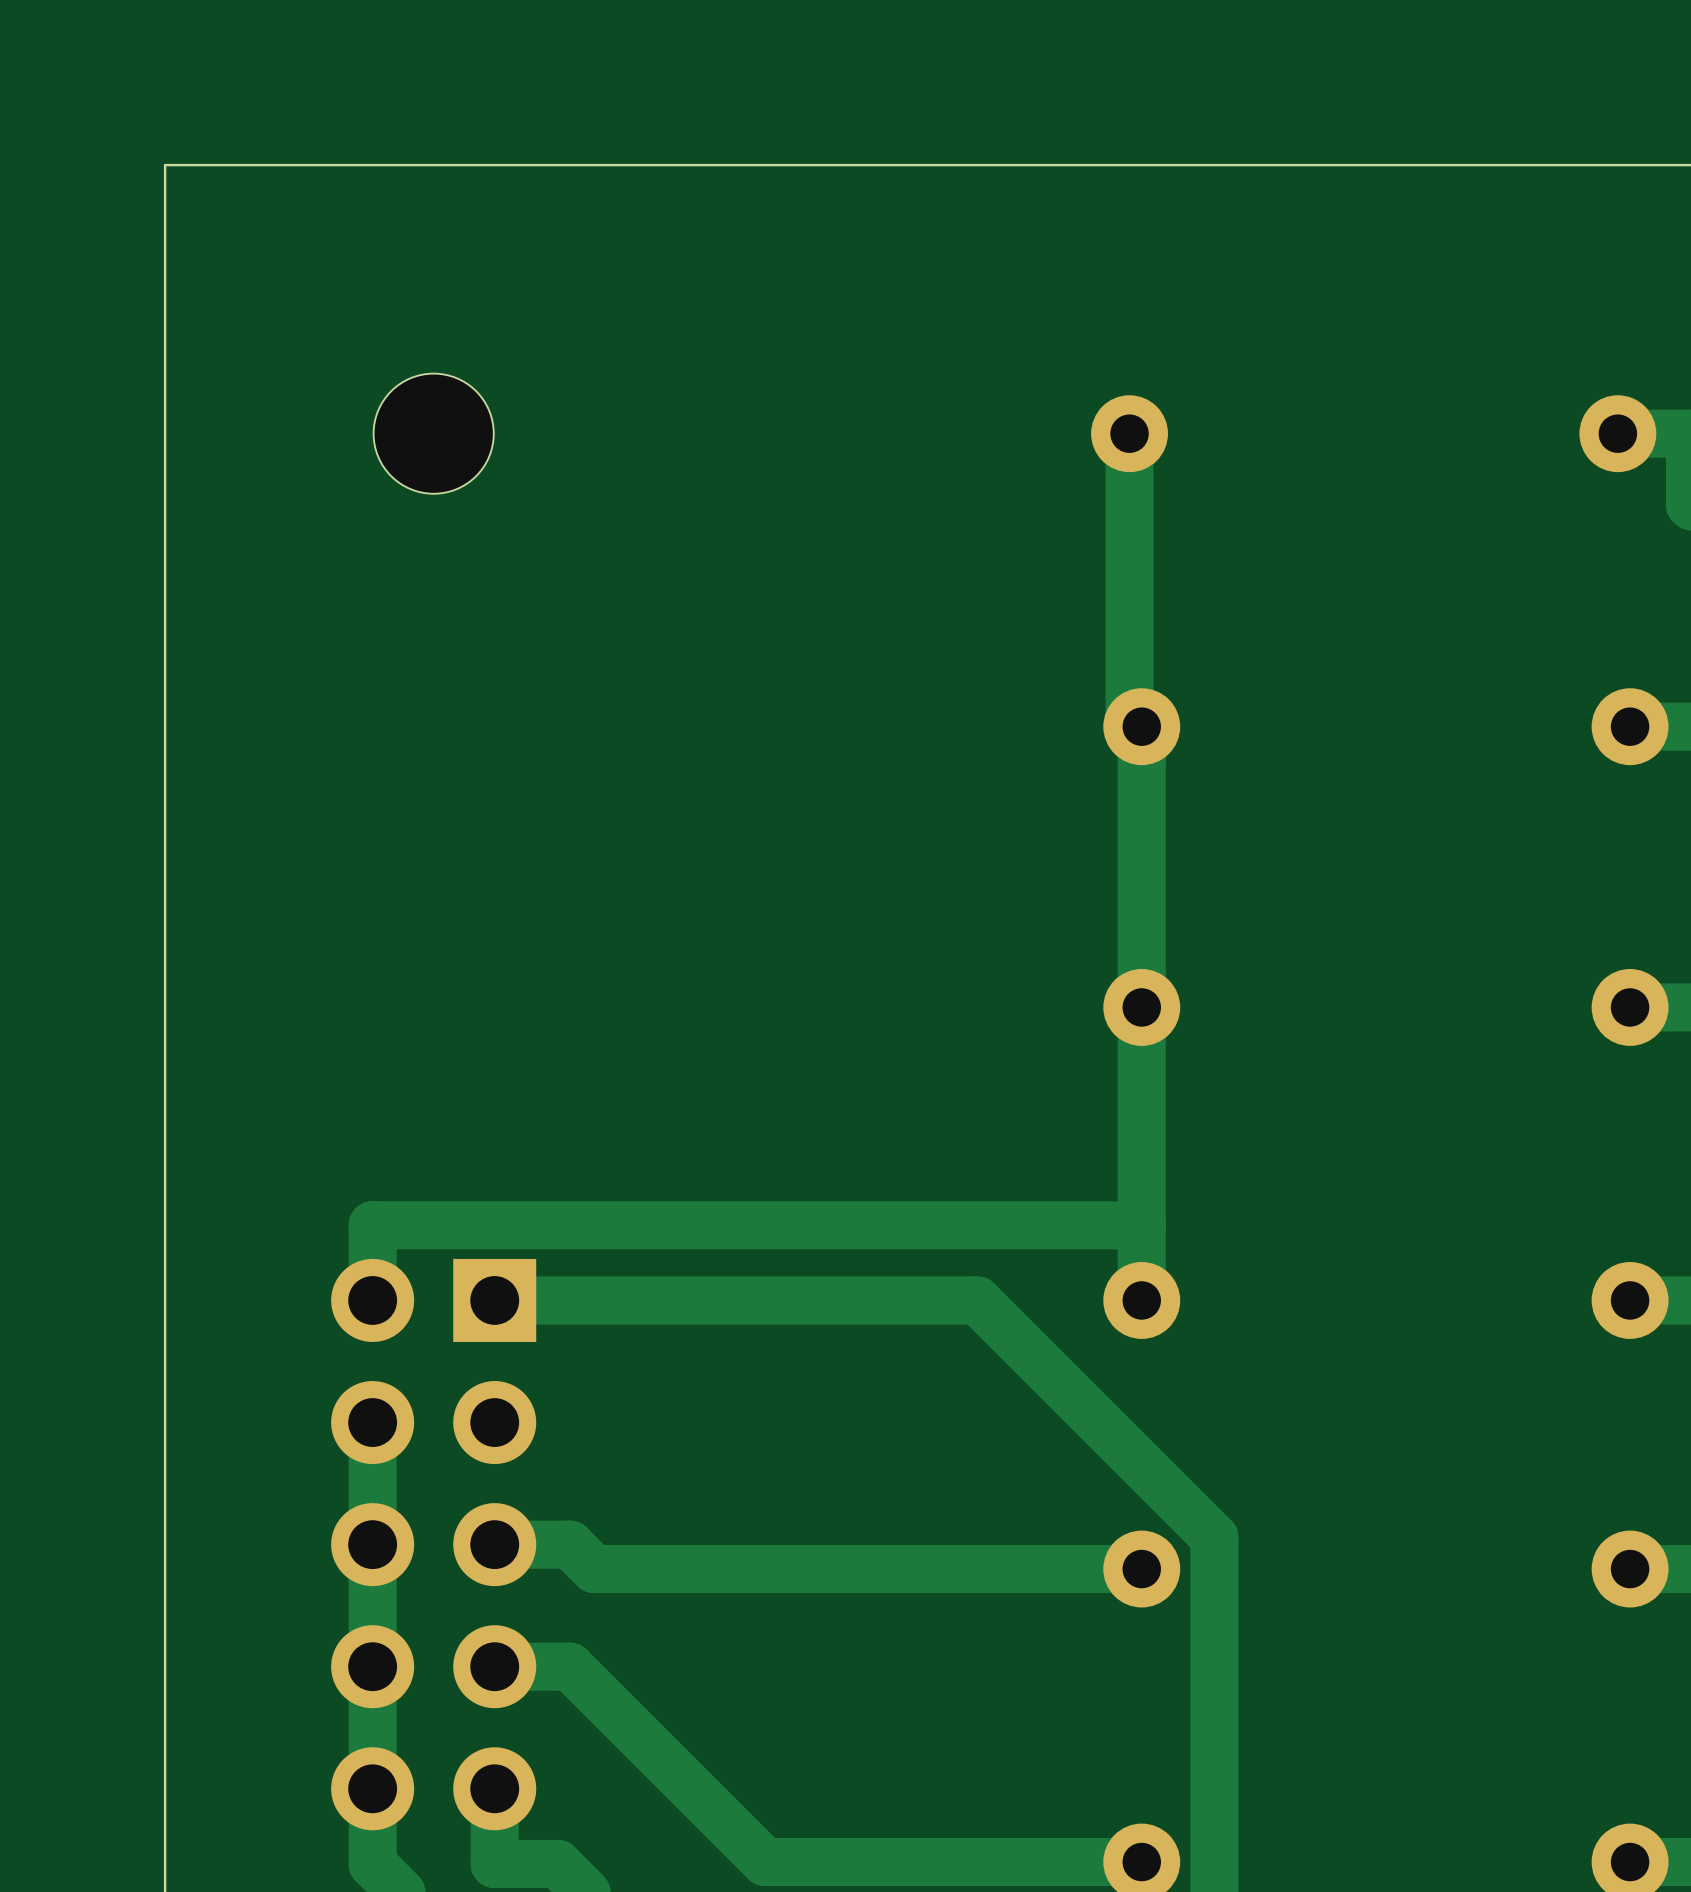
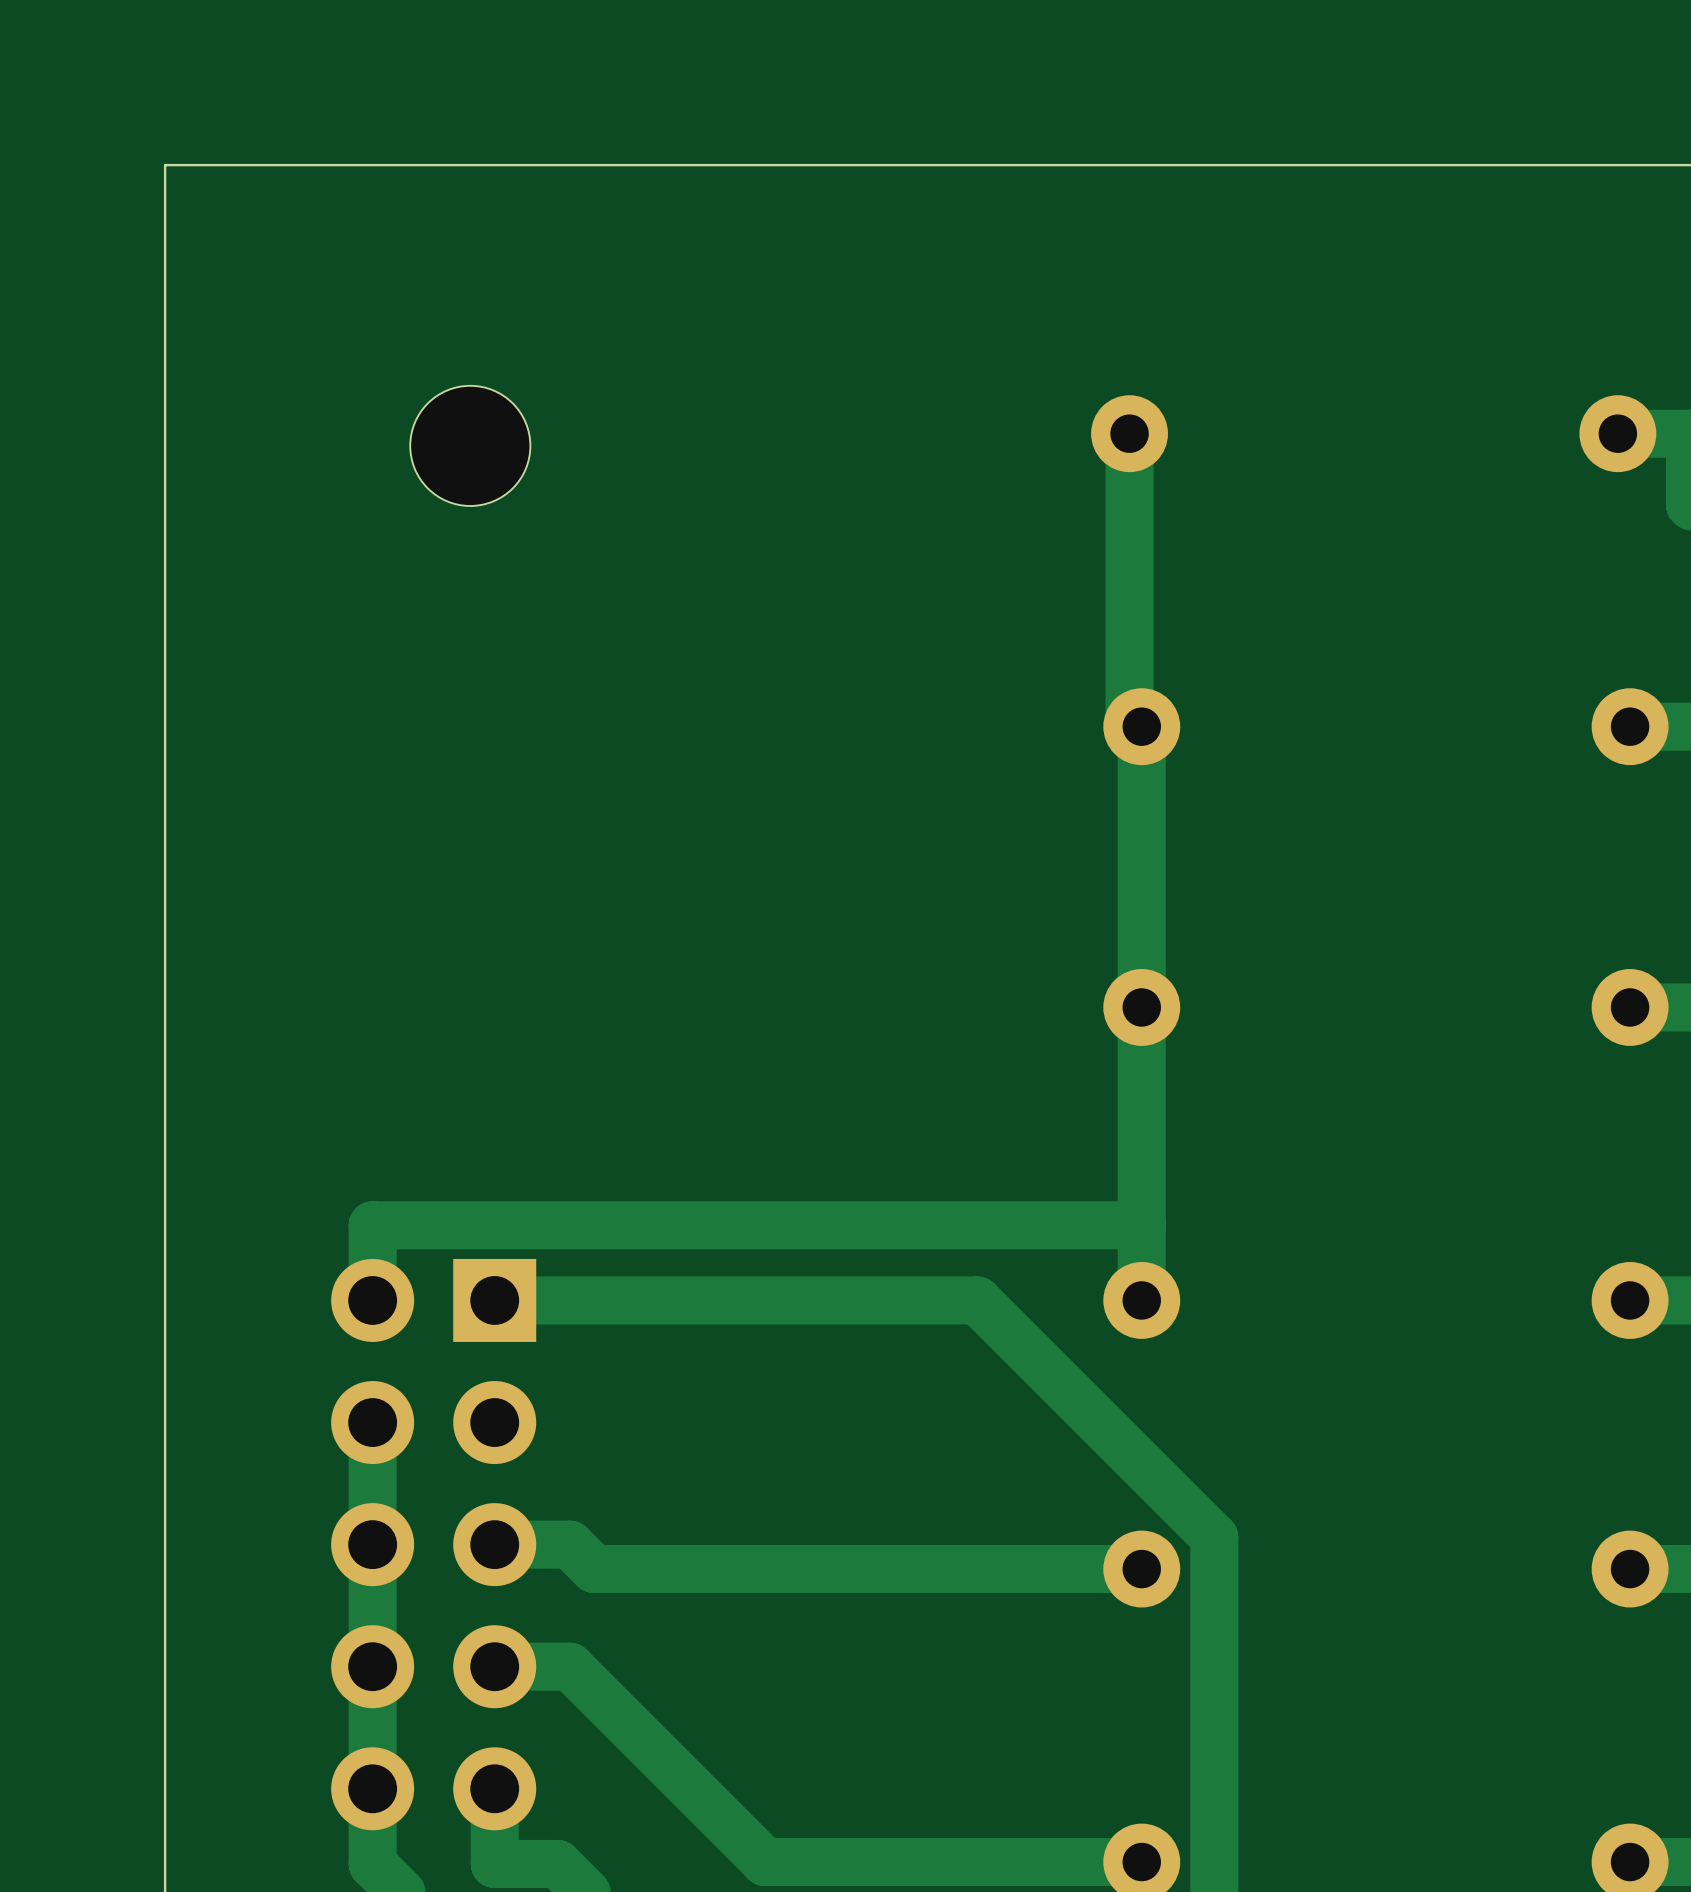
part position: (433, 433) -> (470, 445)

